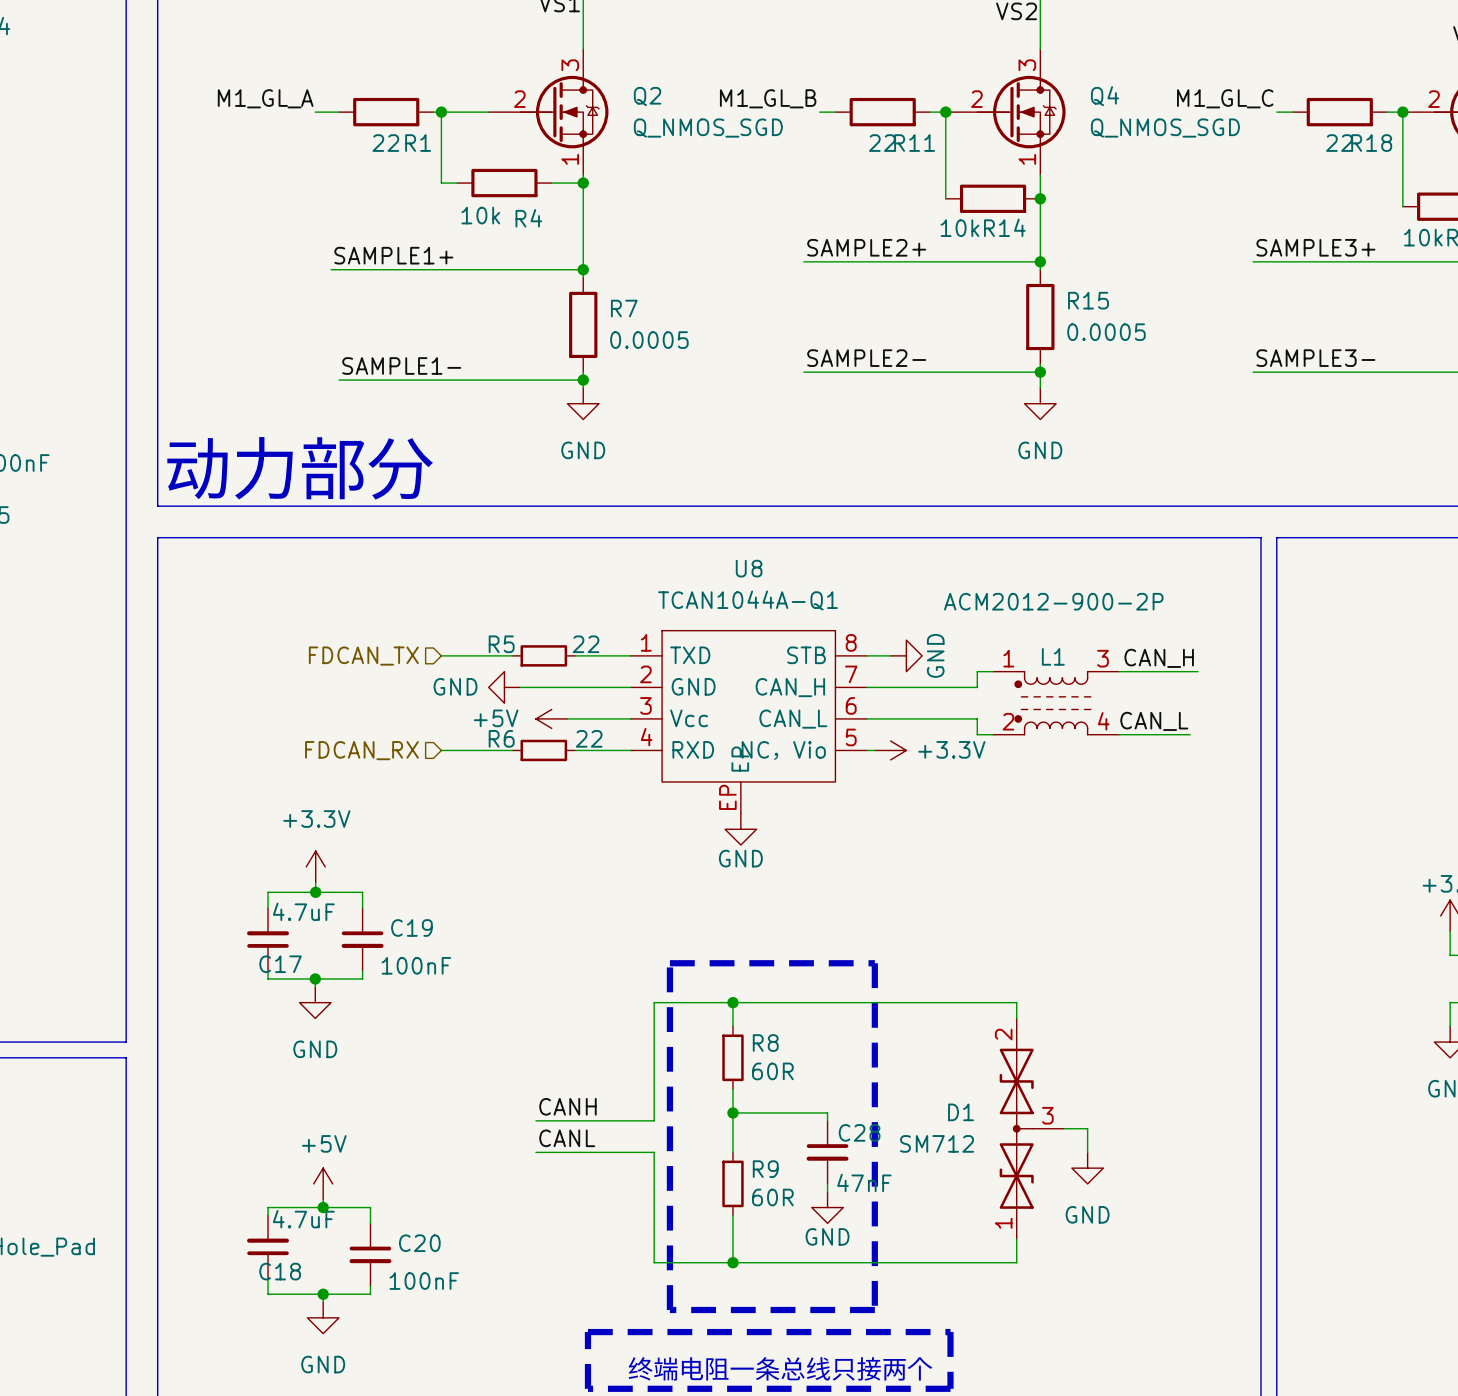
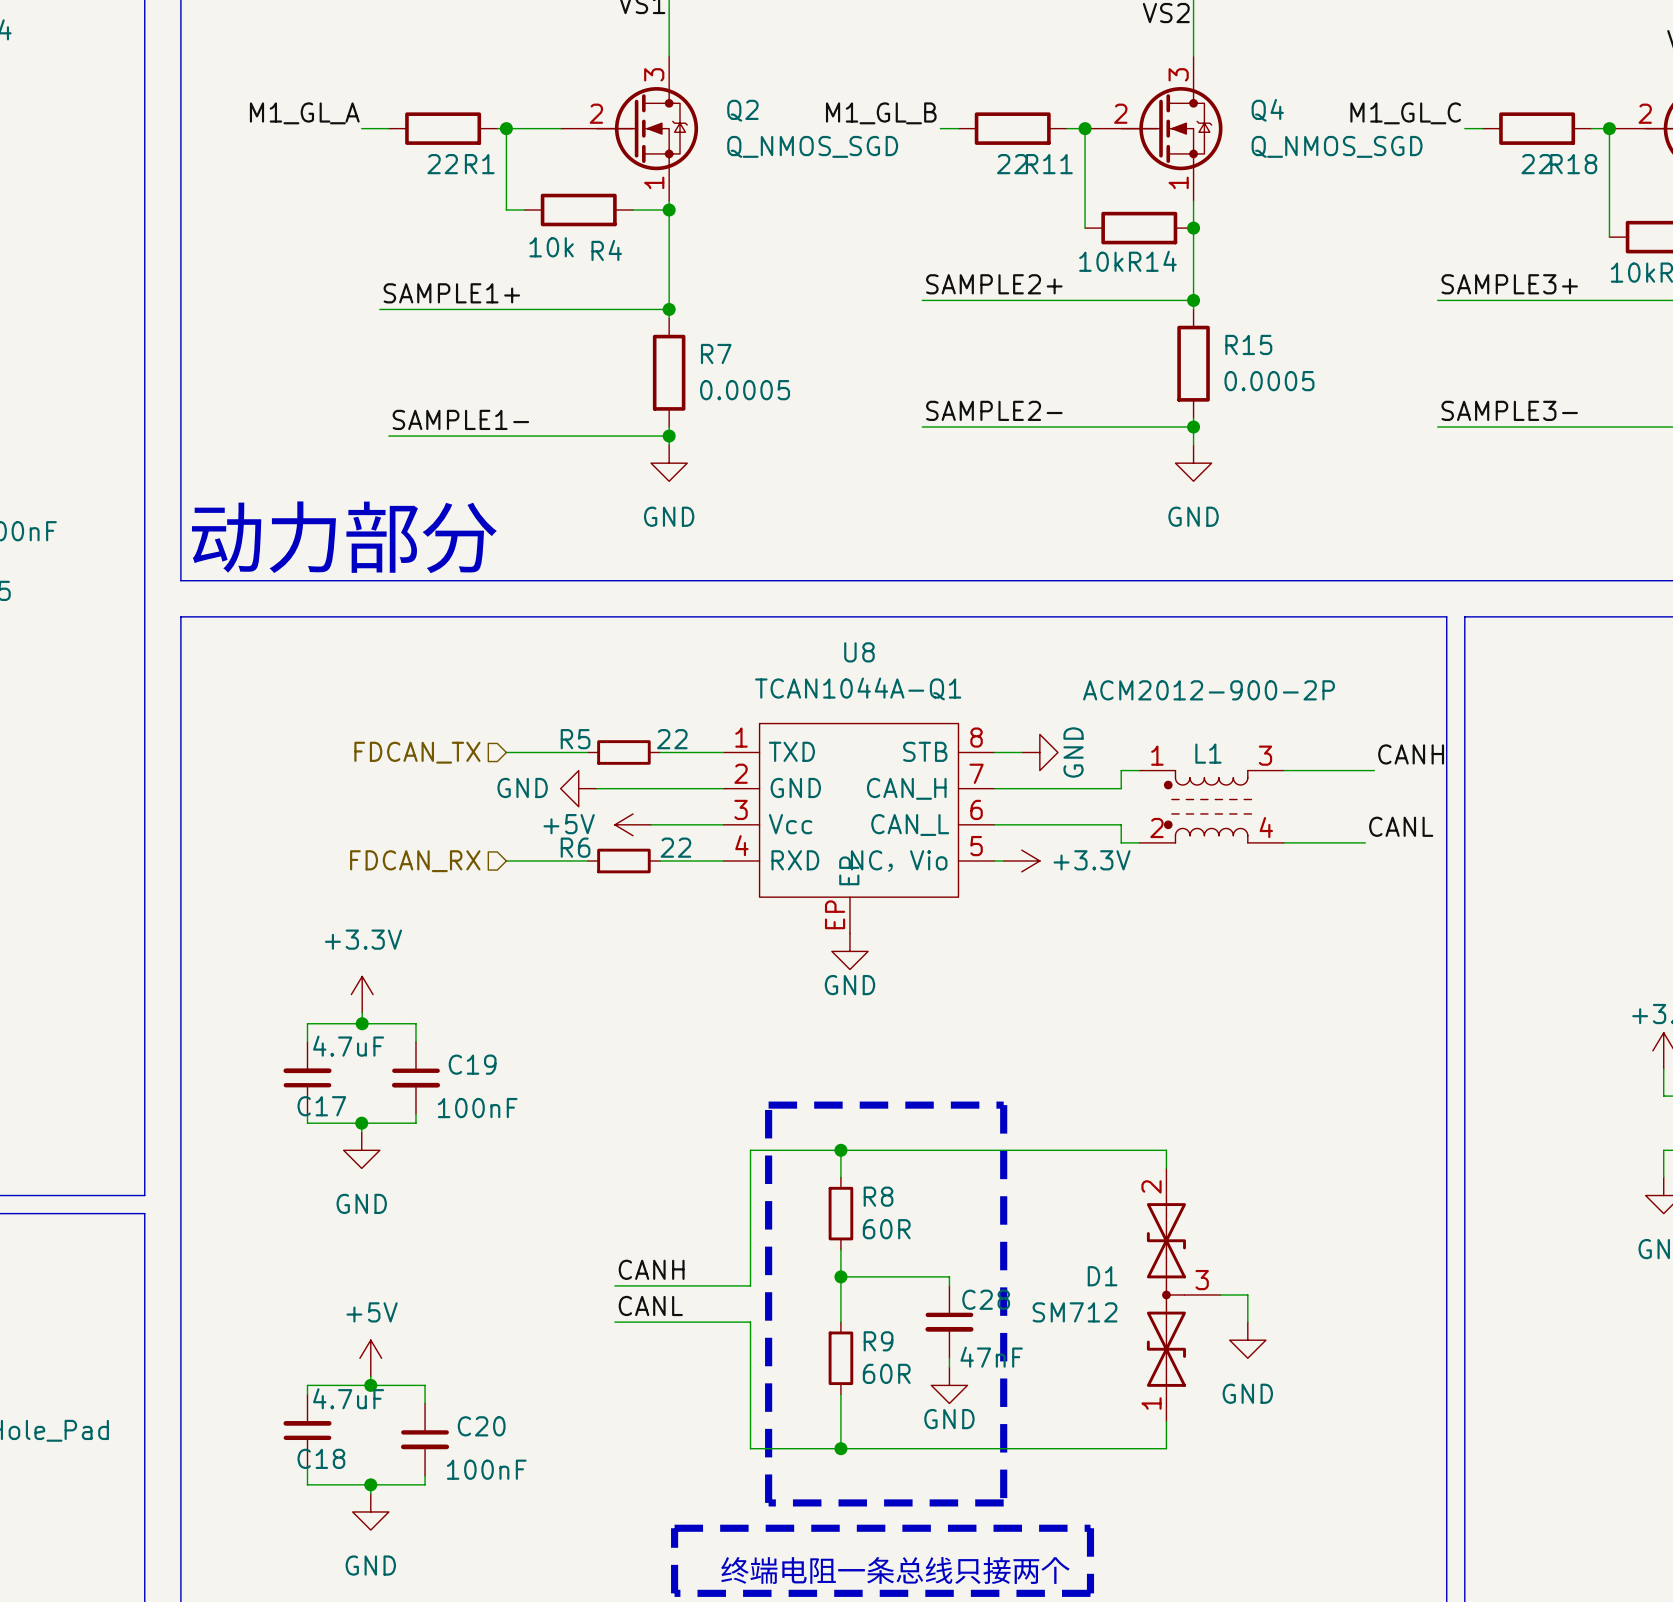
label: CAN_H (1159, 658) -> CANH (1411, 754)
label: CAN_L (1154, 721) -> CANL (1401, 826)

